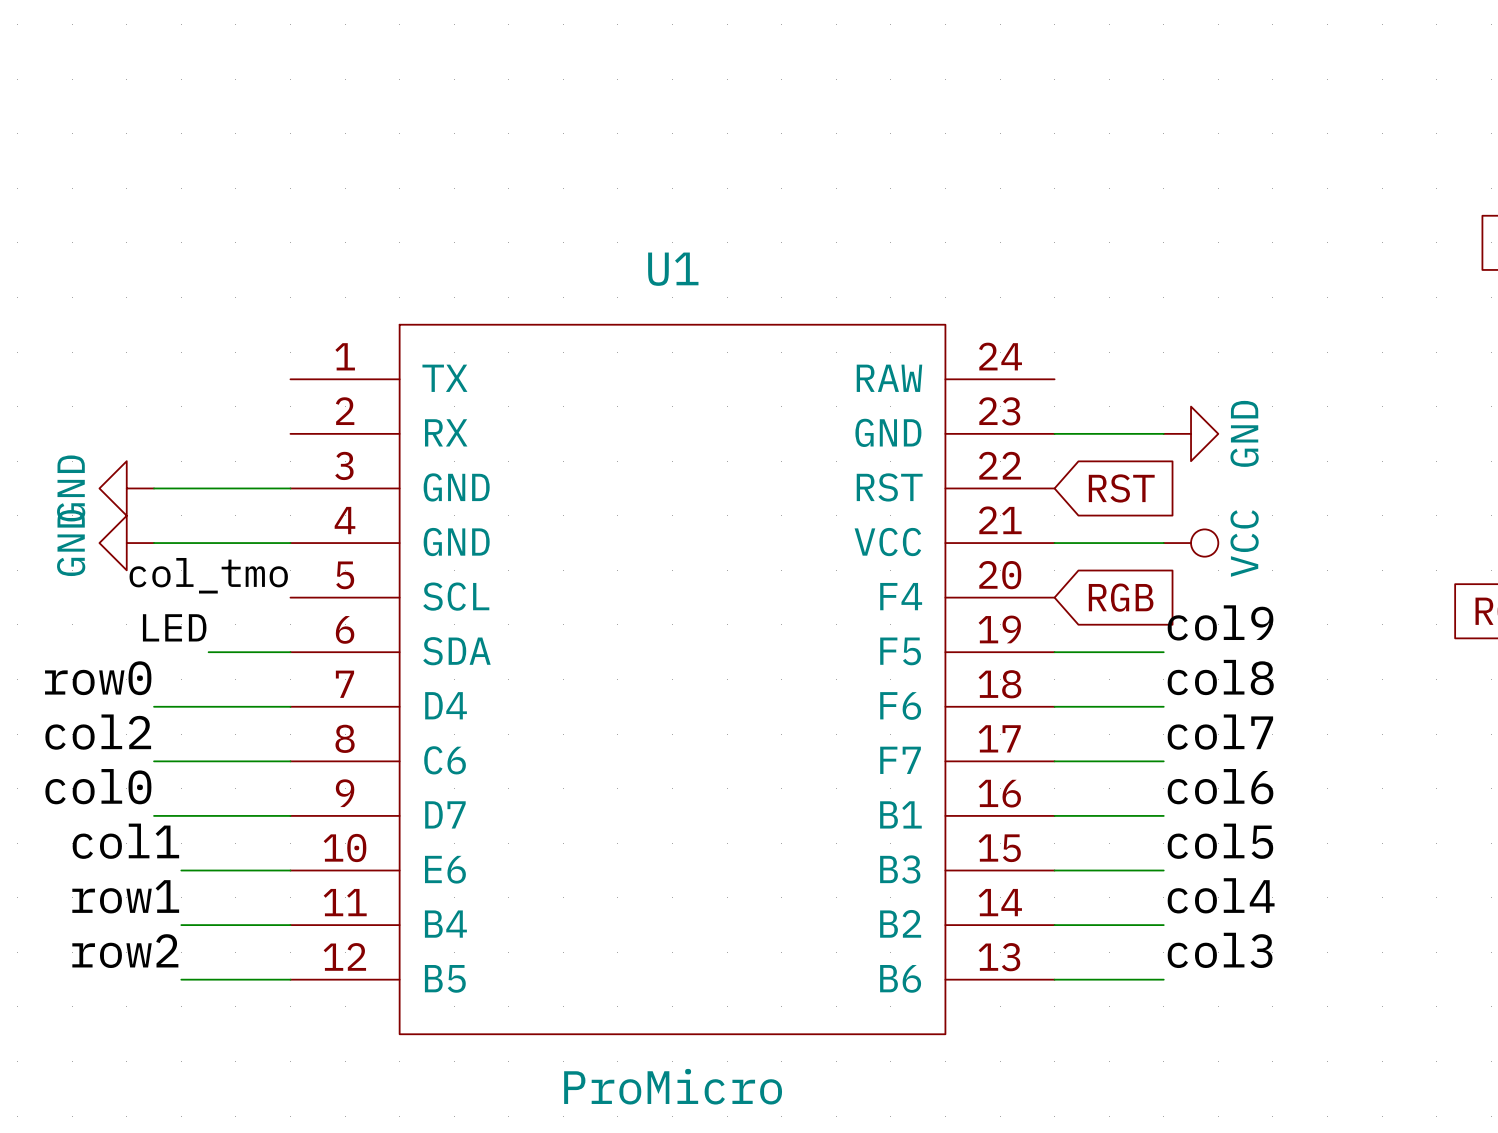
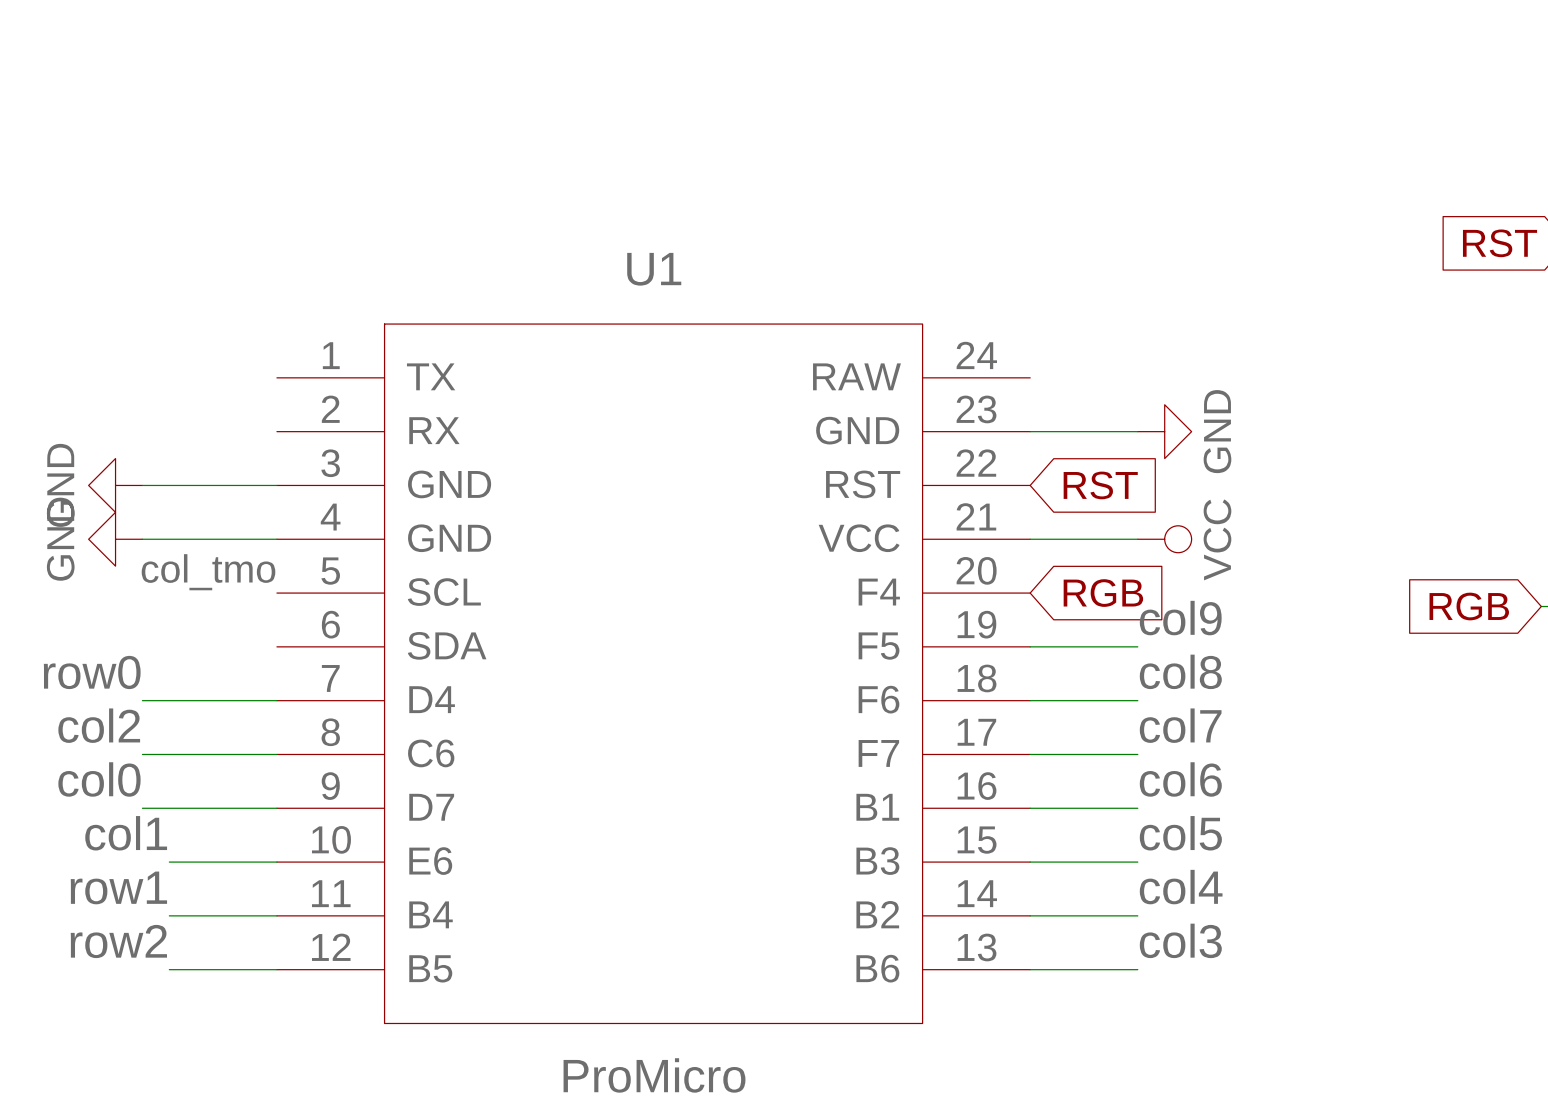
label: LED (174, 627) -> none
wire: (208, 652) (290, 652) -> none

